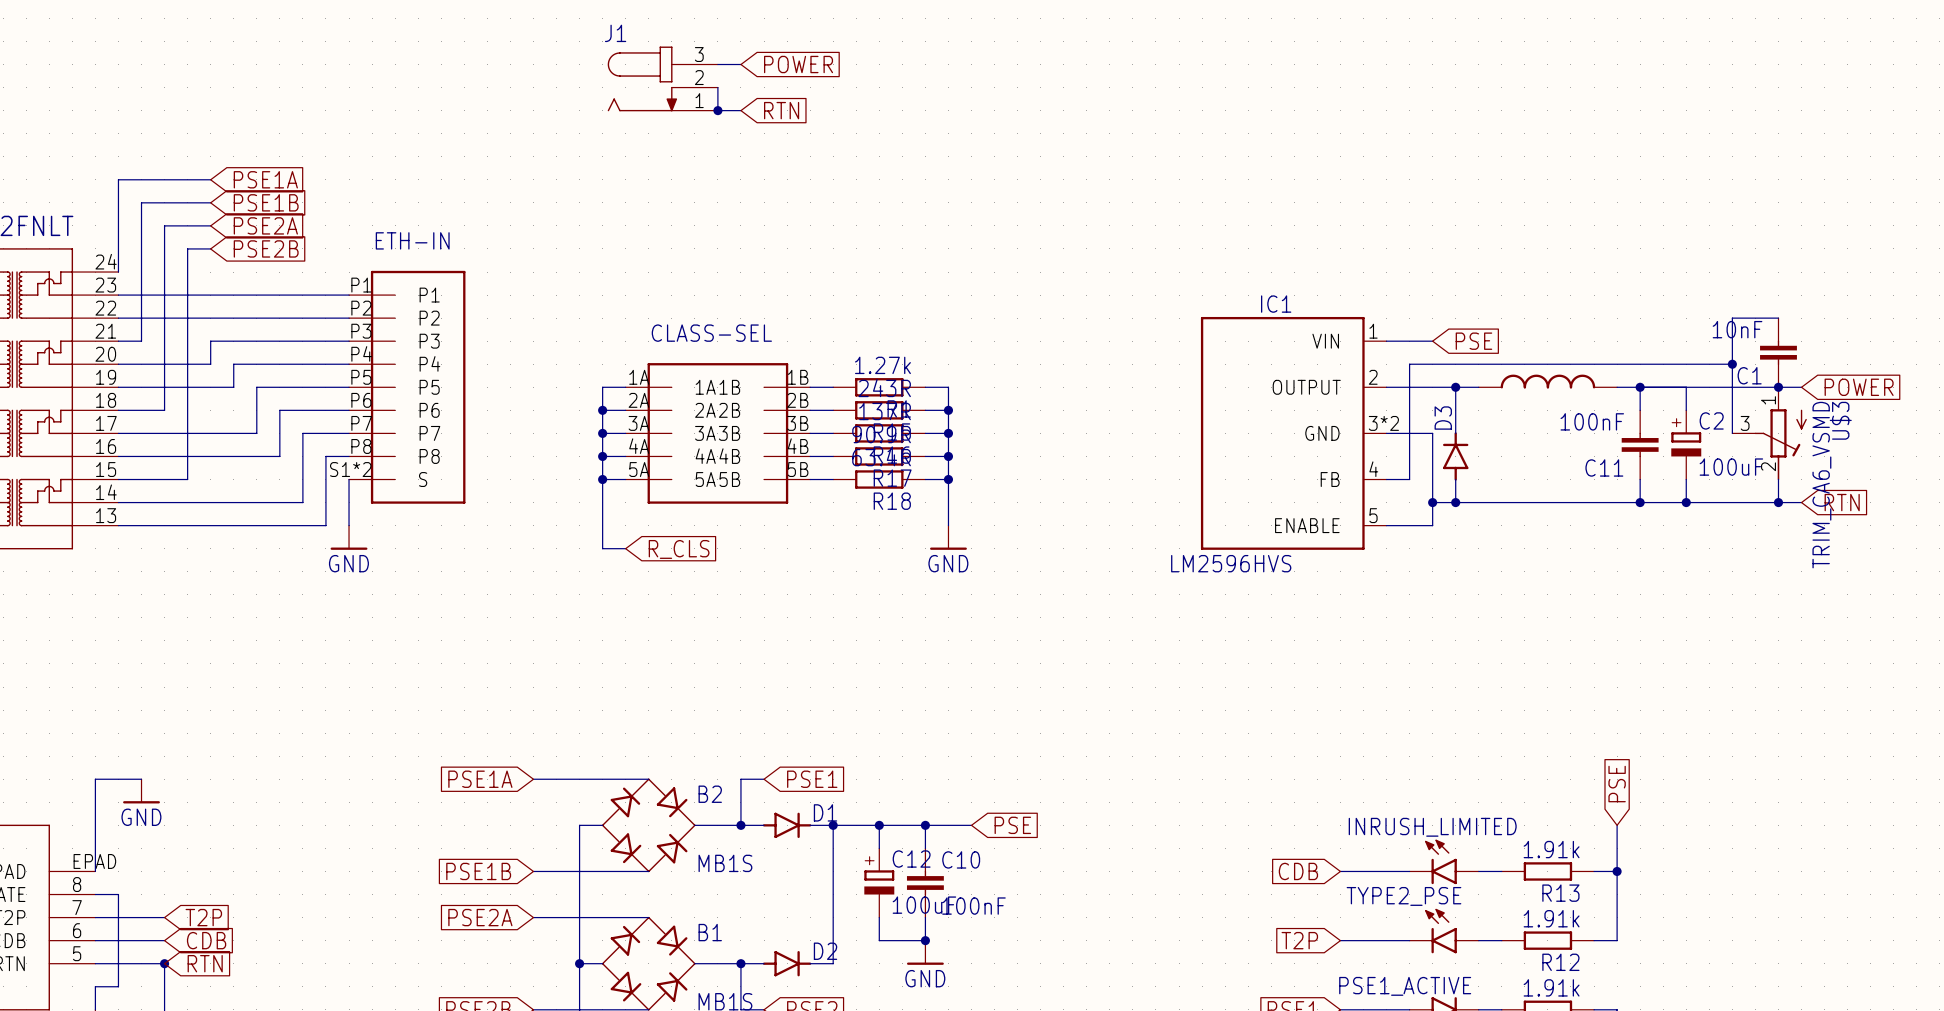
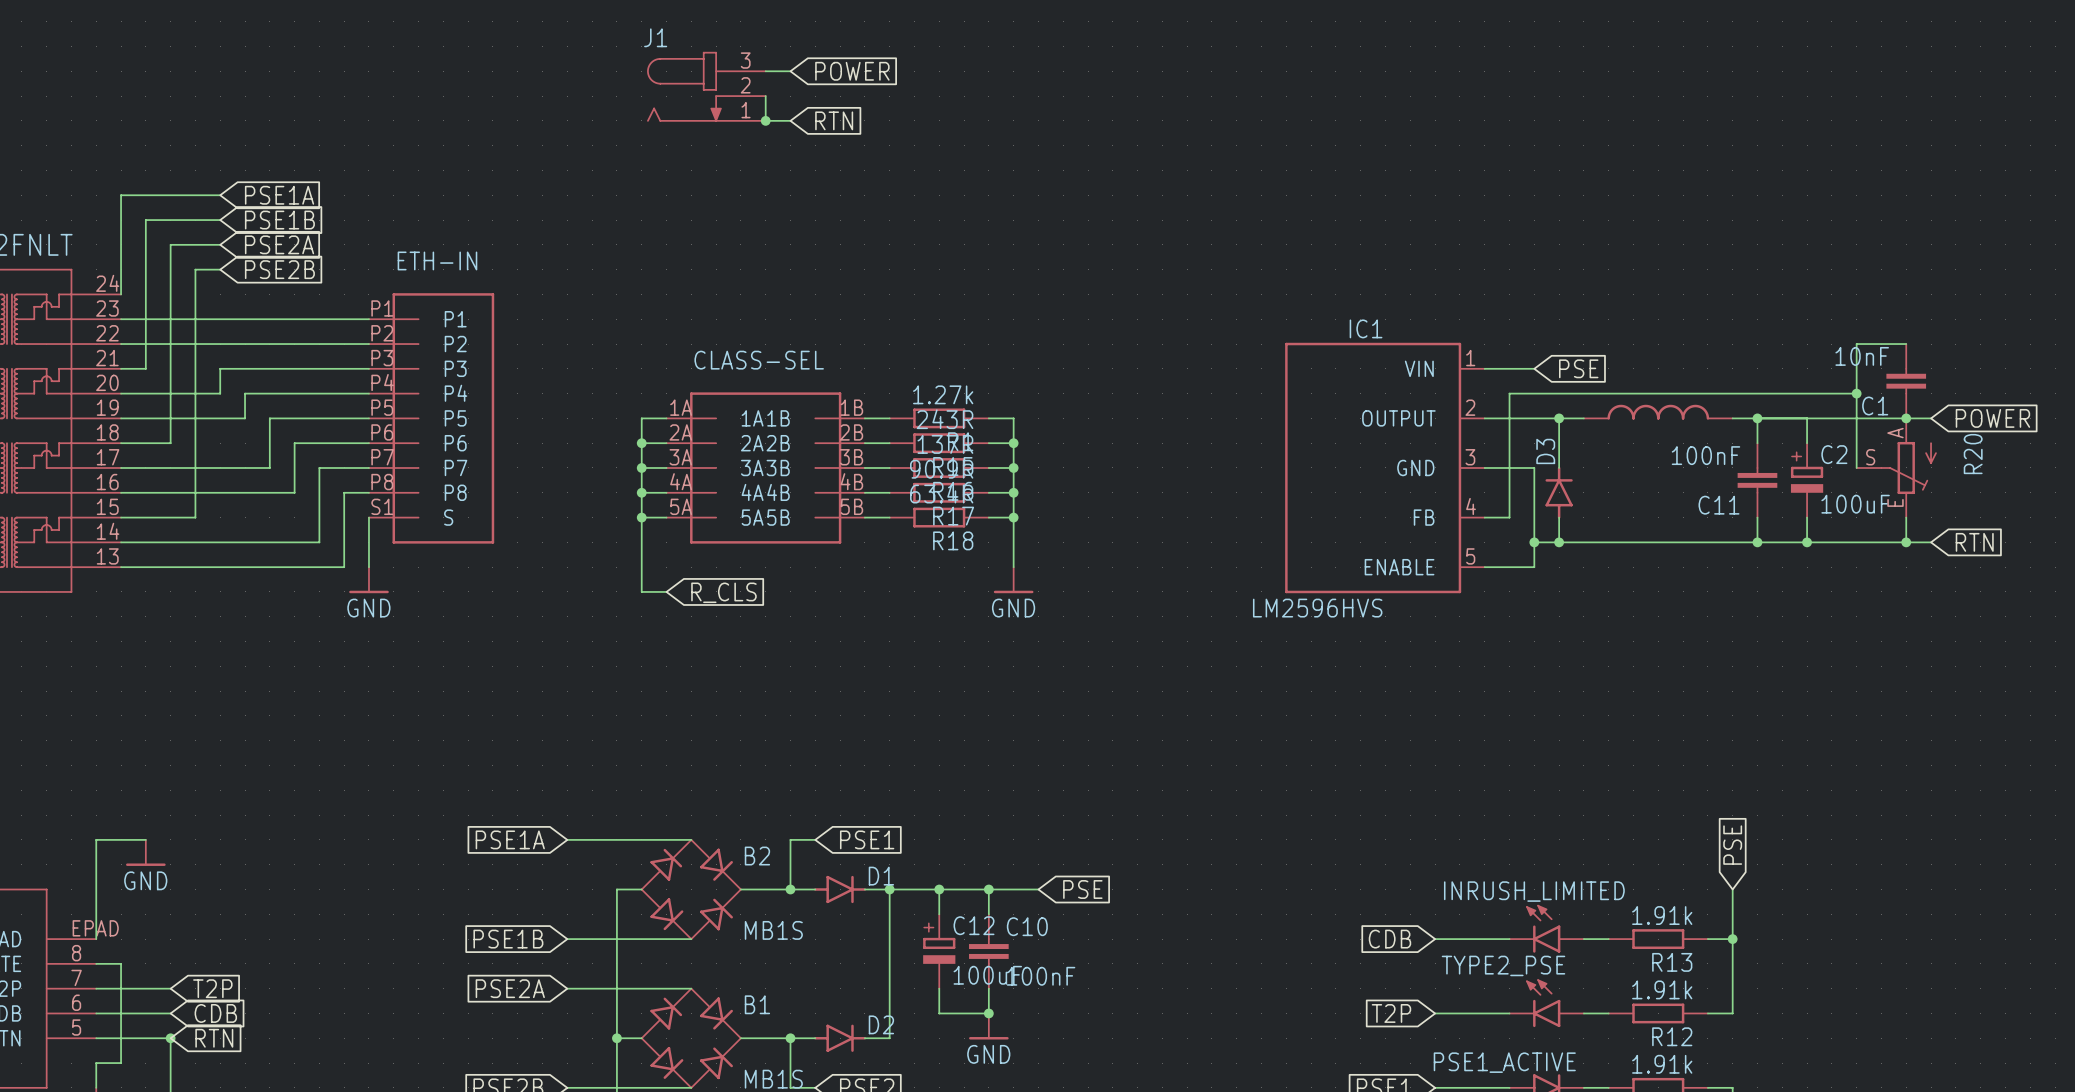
IC1 pin number: 3*2 (1383, 423) -> 3 (1470, 457)
U$3: TRIM_CA6_VSMD (1769, 433) -> none
R20: none -> (1896, 467)
ETH-IN pin number: S1*2 (350, 469) -> S1 (382, 506)

